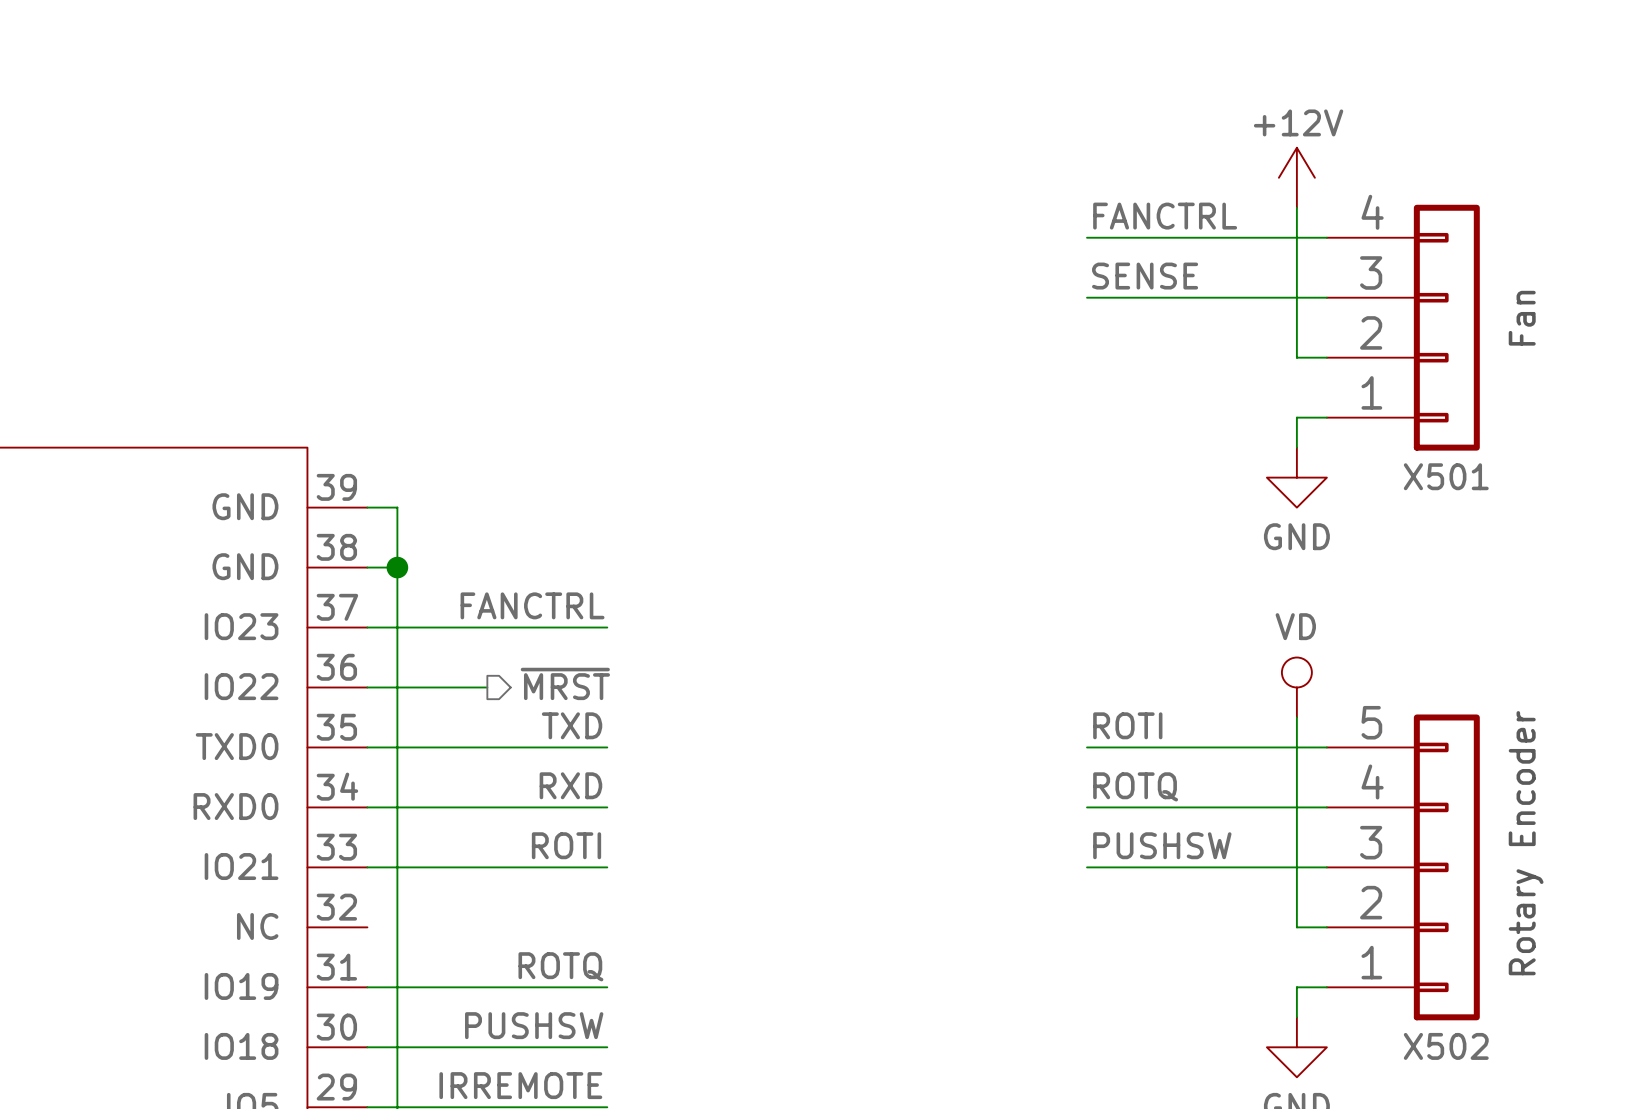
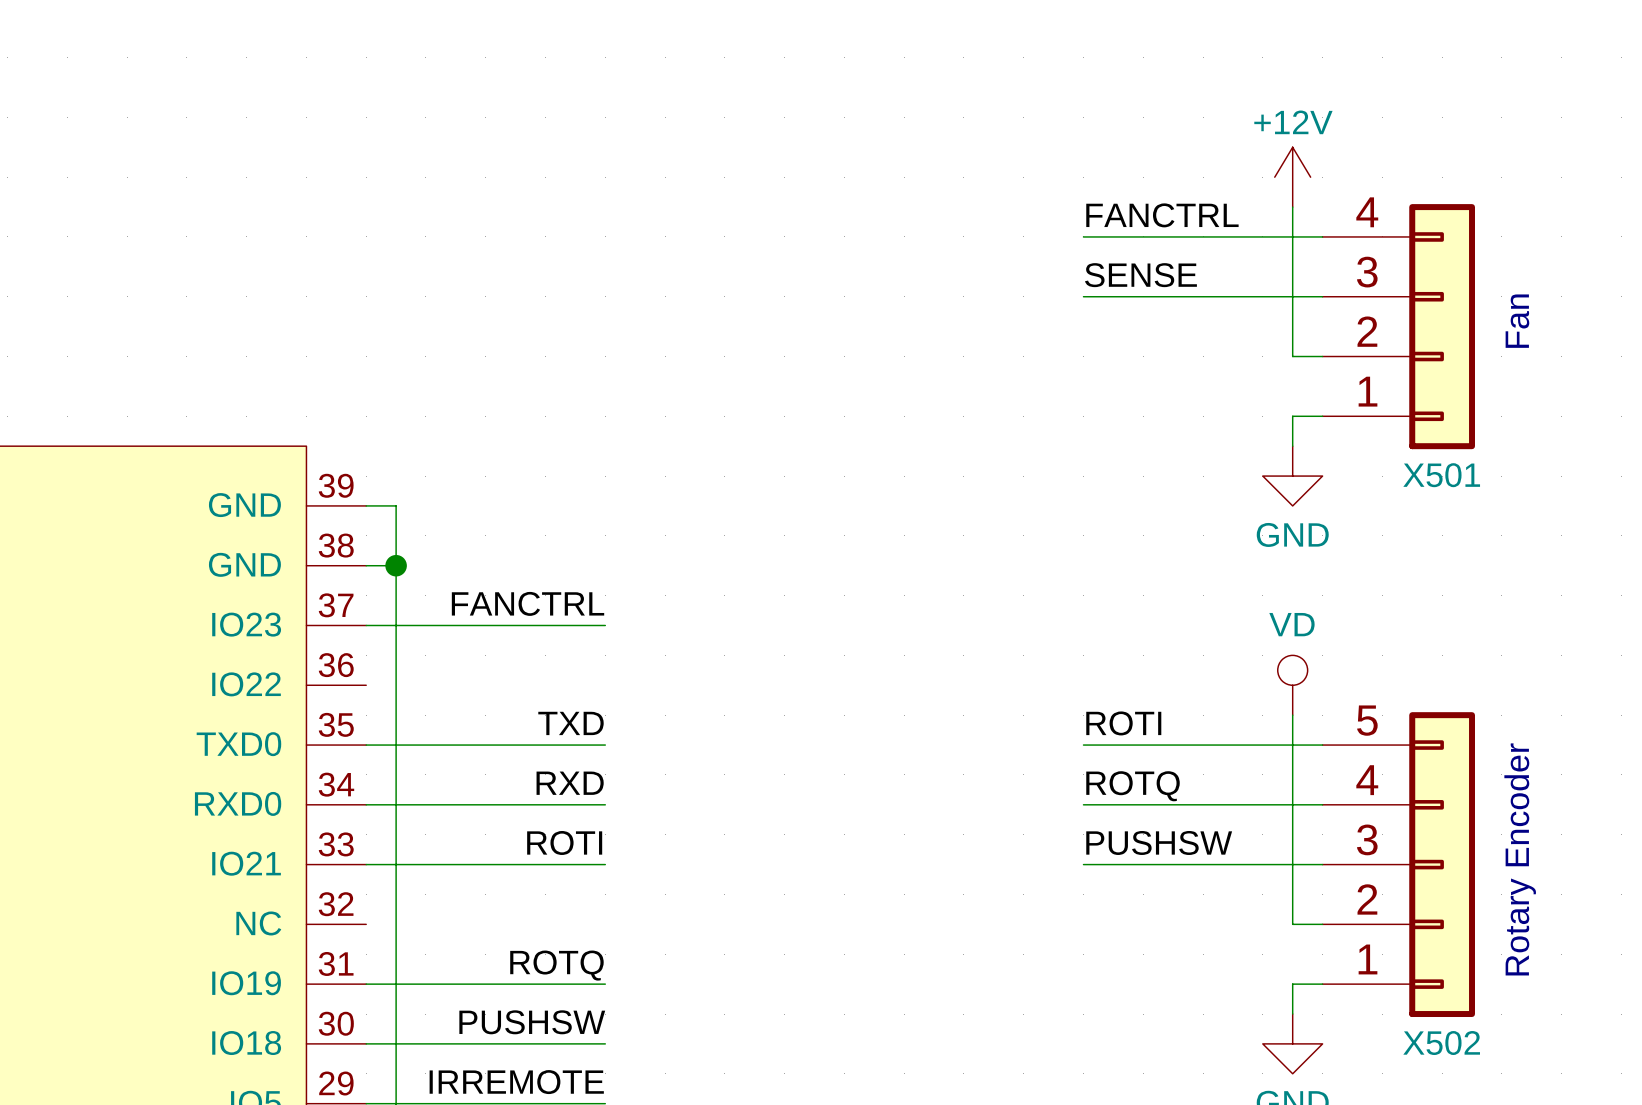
hierarchical label: ~{MRST} (565, 683) -> none
wire: (367, 687) (487, 687) -> none

